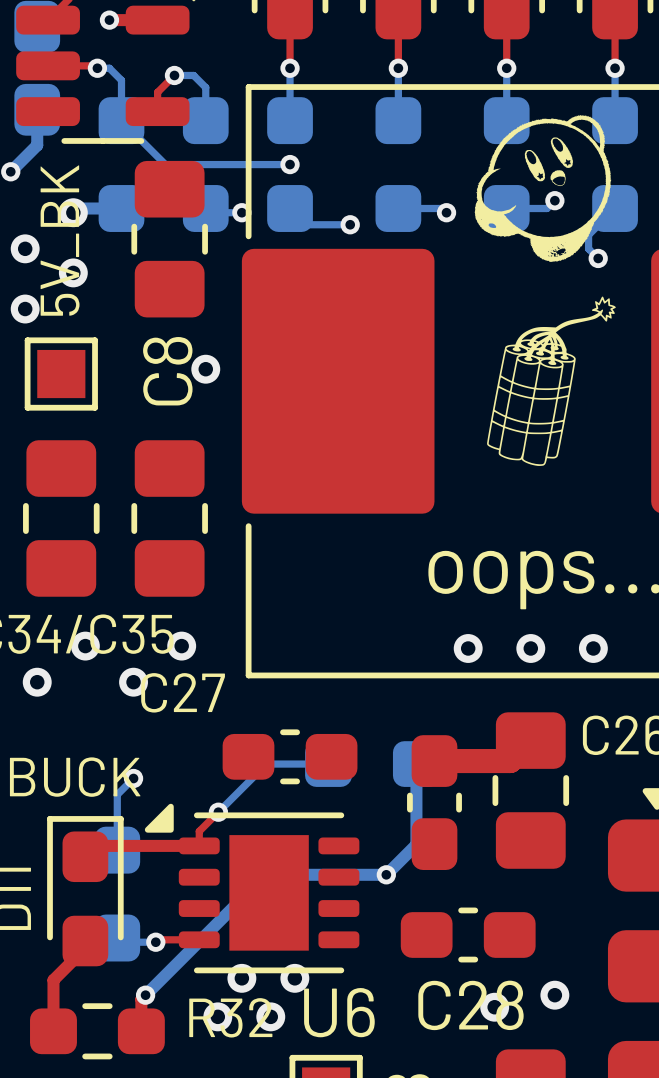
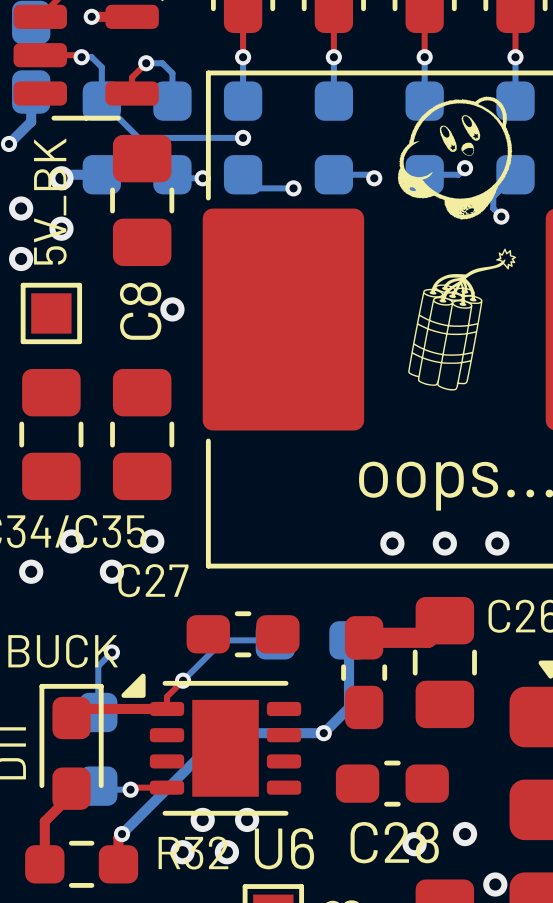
via: none -> (495, 884)

